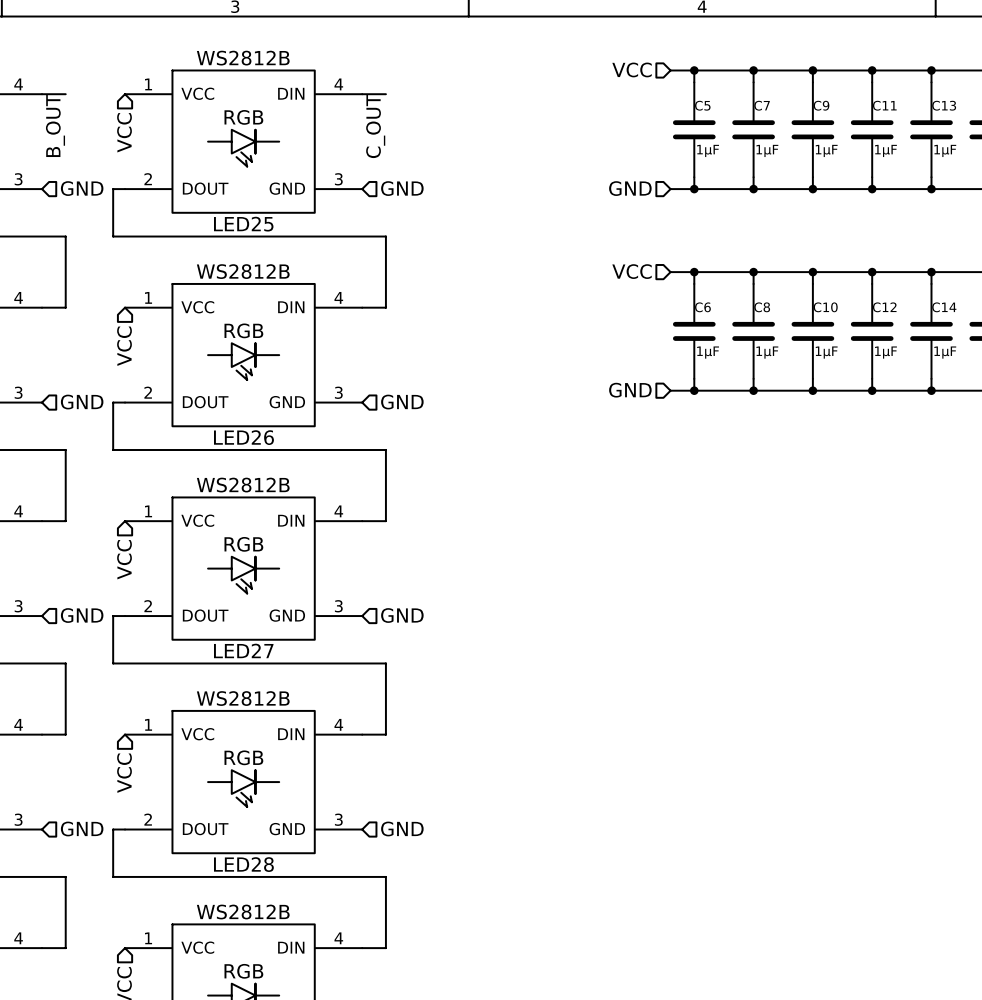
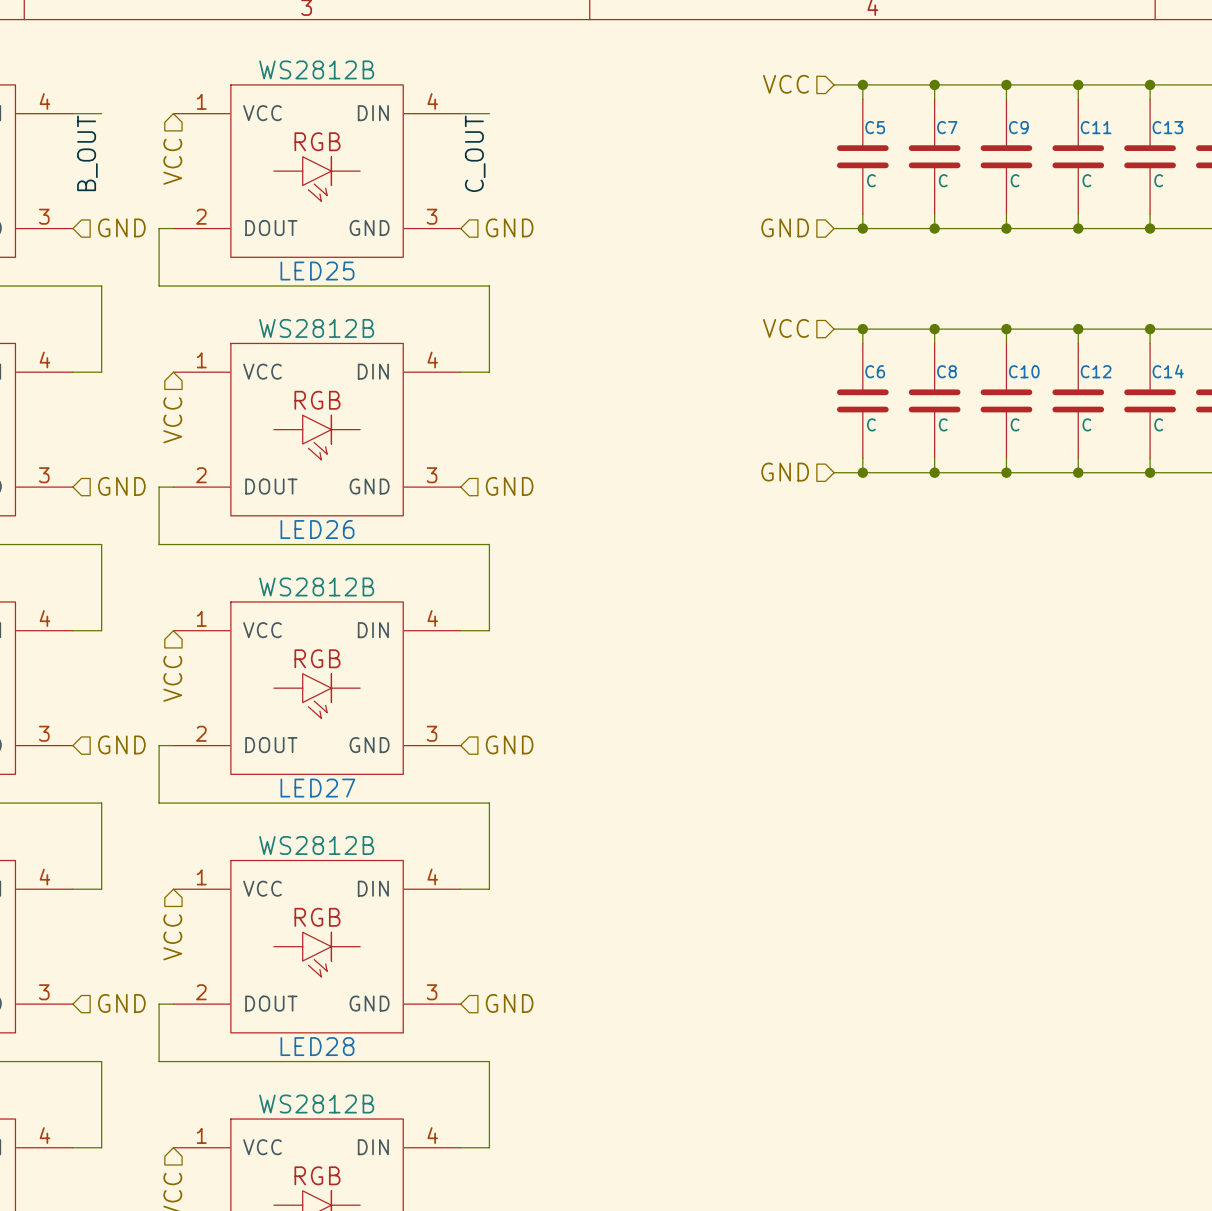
C5 value: 1µF (708, 150) -> C (871, 180)
C7 value: 1µF (767, 150) -> C (943, 180)
C9 value: 1µF (826, 150) -> C (1015, 180)
C11 value: 1µF (885, 150) -> C (1086, 180)
C13 value: 1µF (945, 150) -> C (1158, 180)
C6 value: 1µF (708, 352) -> C (871, 424)
C8 value: 1µF (767, 352) -> C (943, 424)
C10 value: 1µF (826, 352) -> C (1015, 424)
C12 value: 1µF (885, 352) -> C (1086, 424)
C14 value: 1µF (945, 352) -> C (1158, 424)

